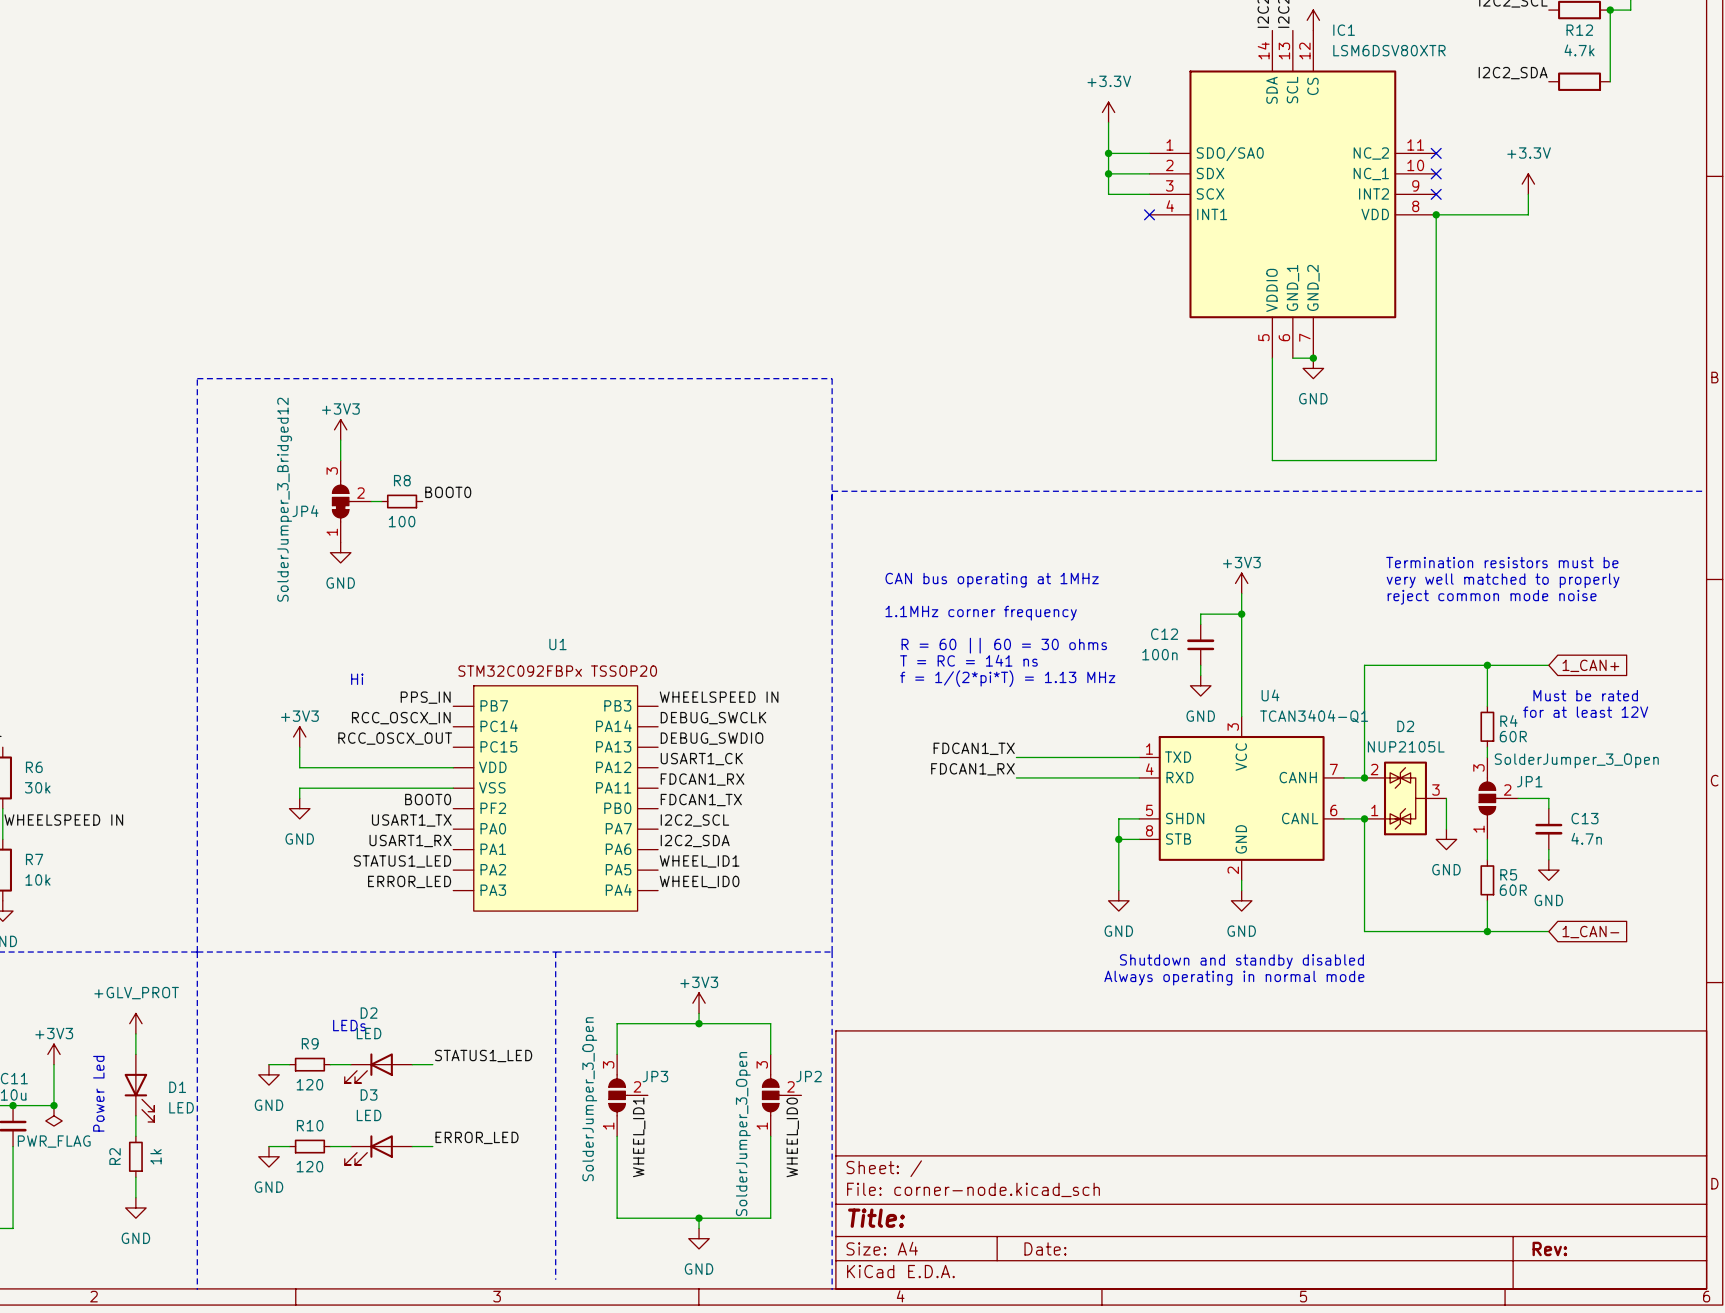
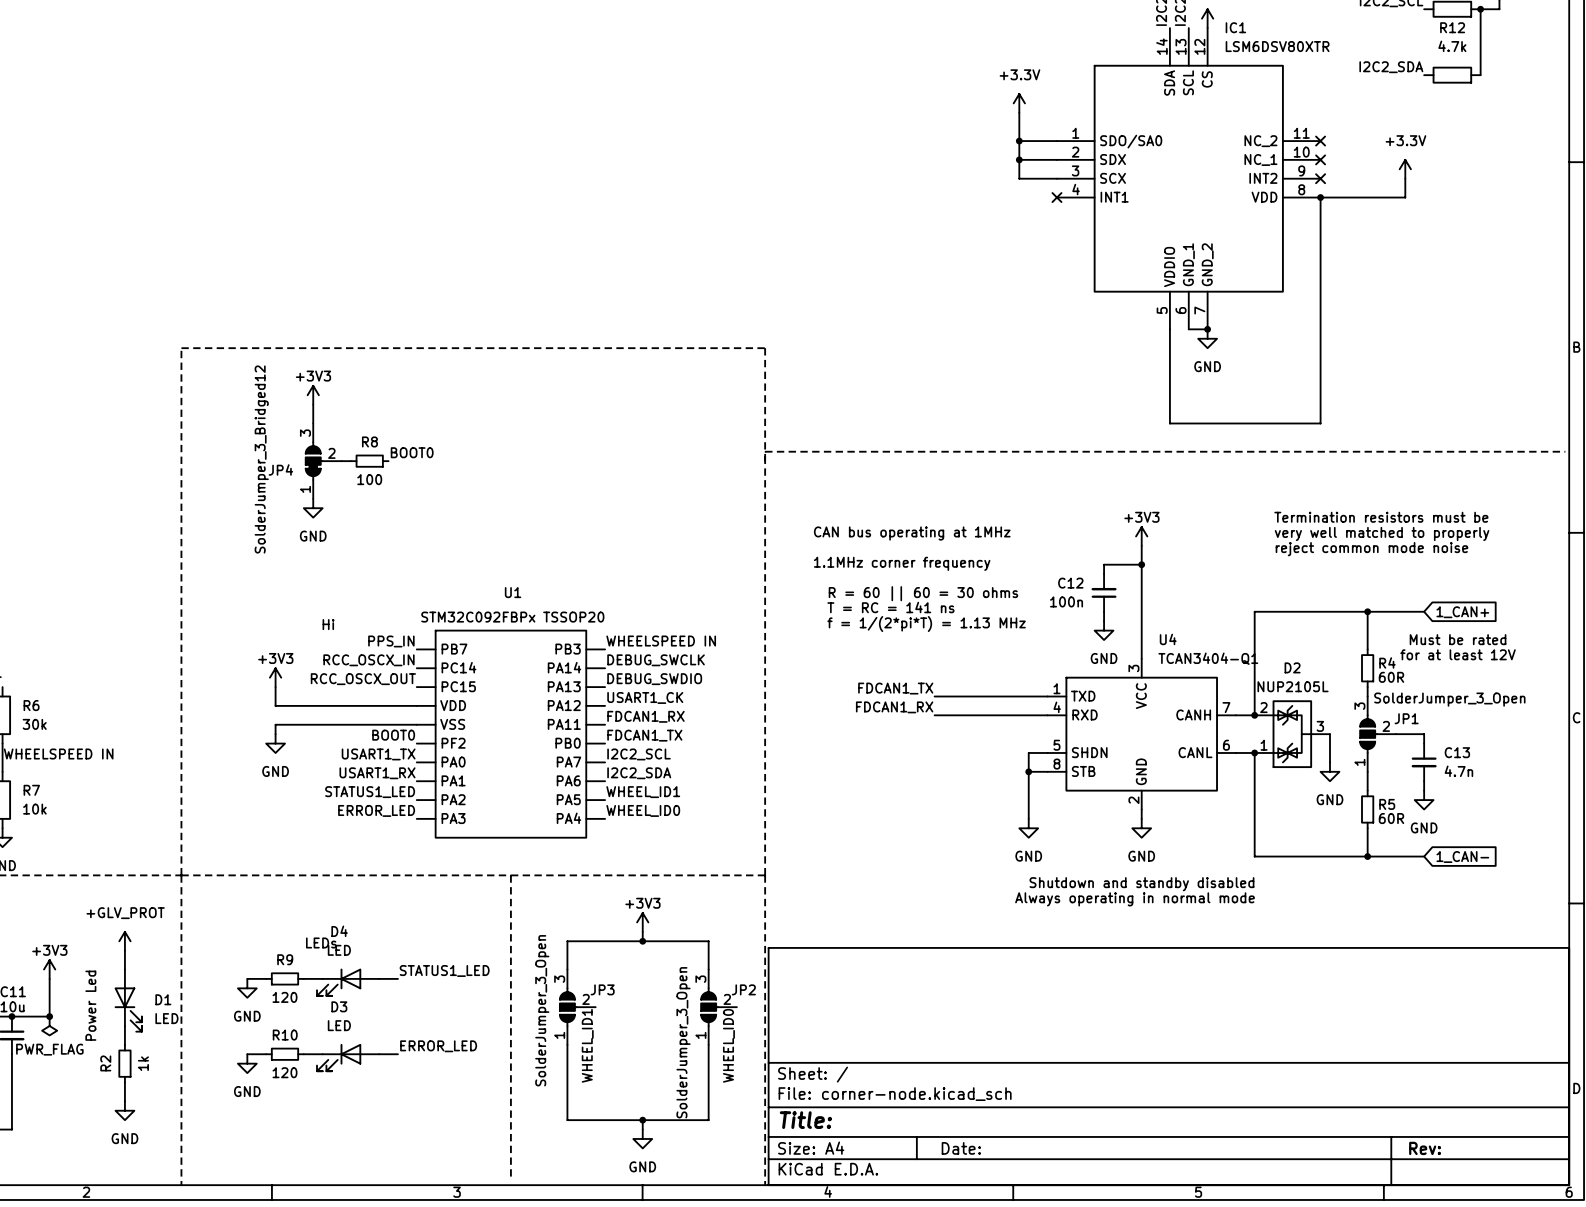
D2 name: D2 (369, 1013) -> D4 (339, 931)

